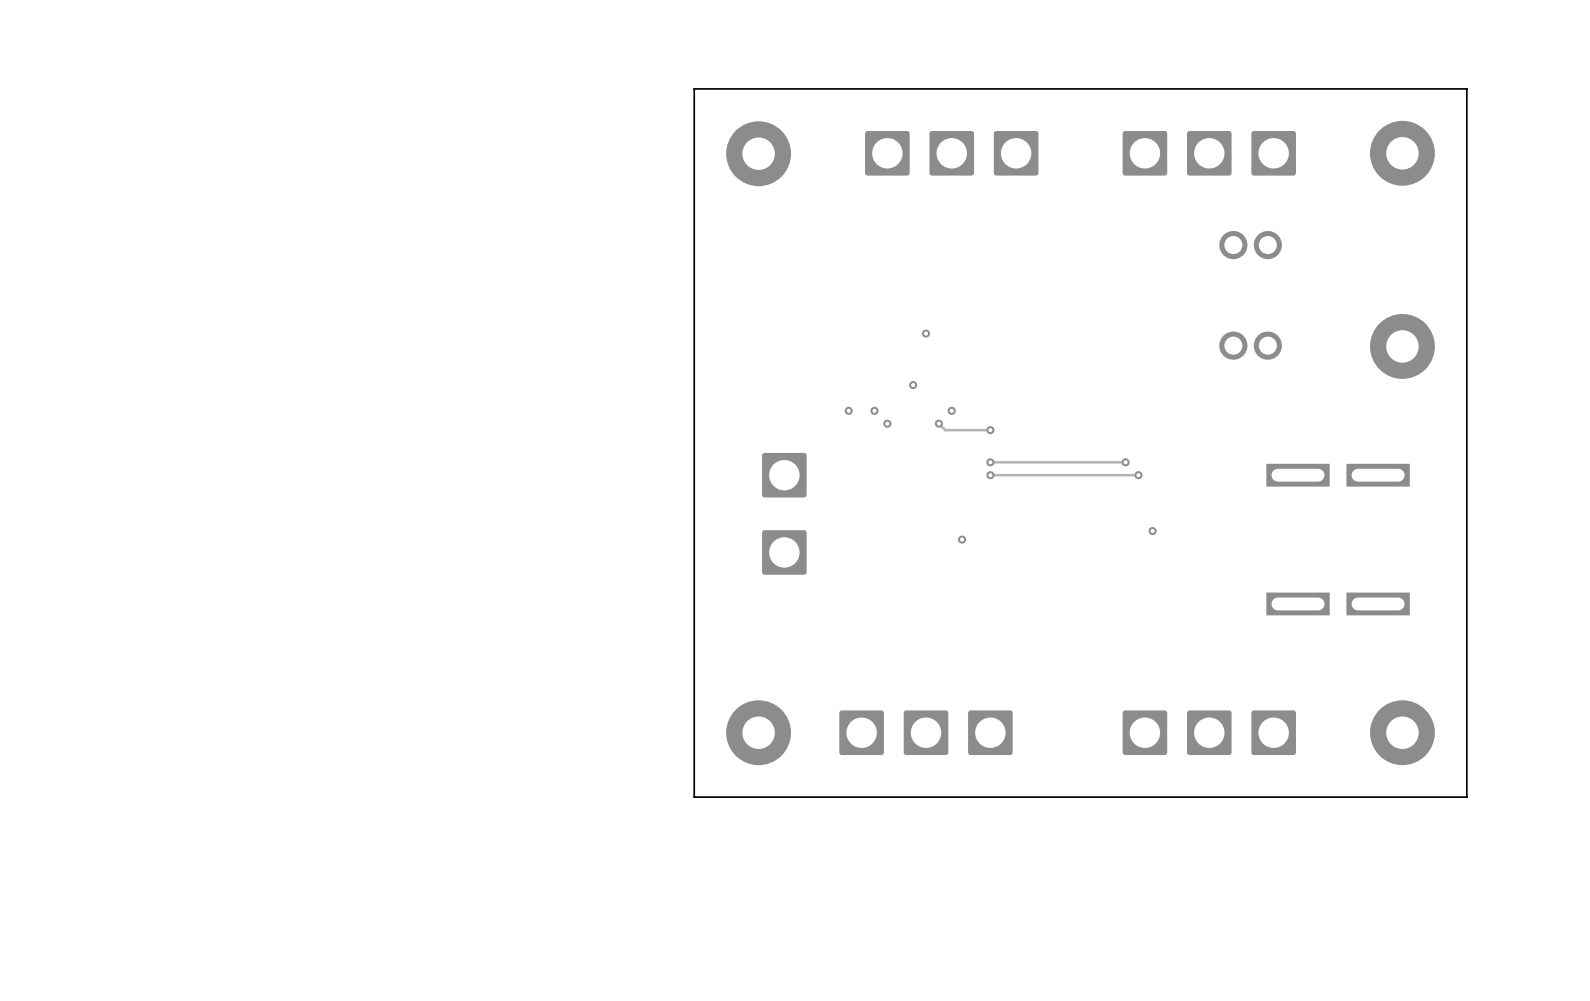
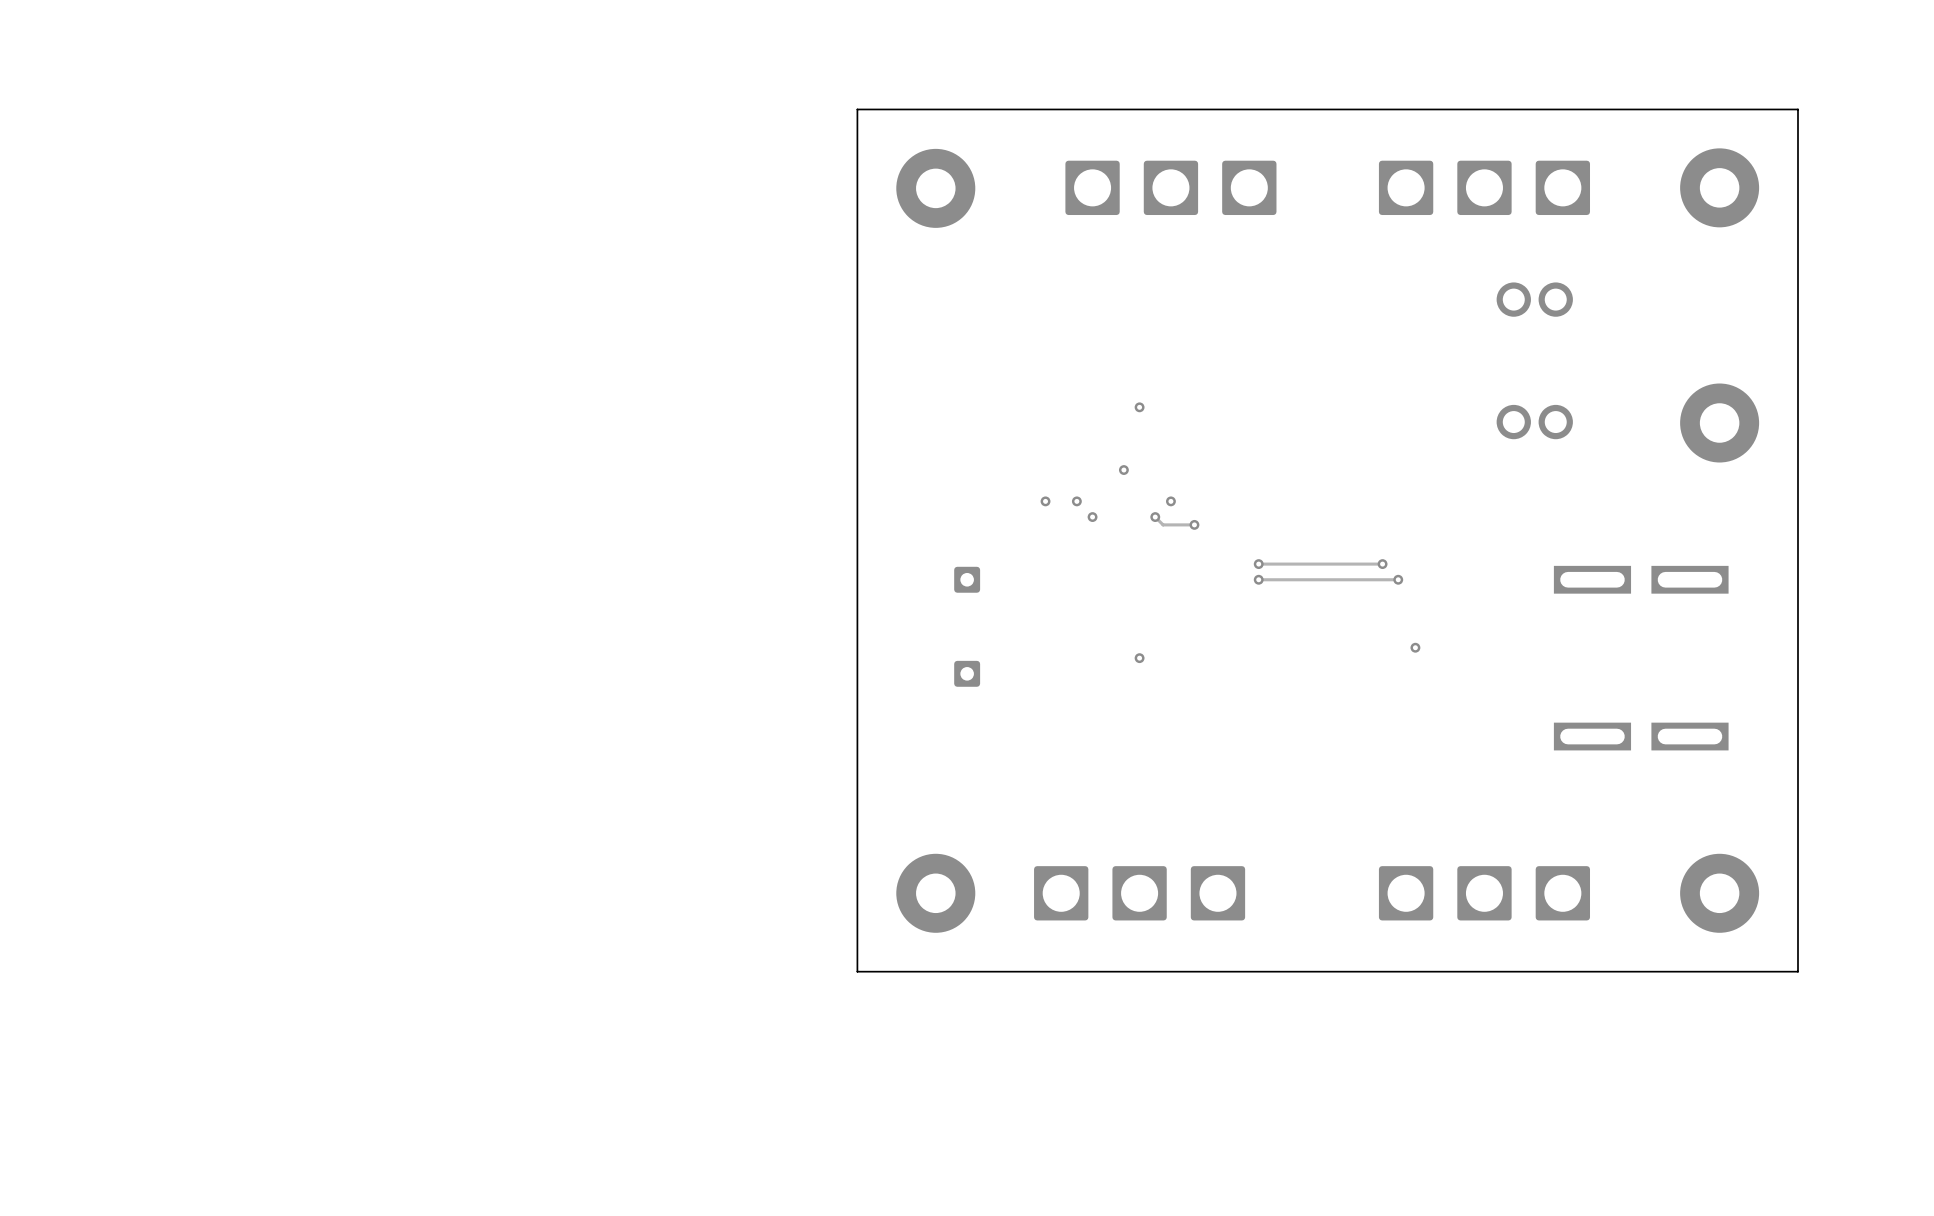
via: none -> (1194, 524)
track: (990, 430) (971, 430) -> none
via: (990, 430) -> none
part footprint: [762, 452, 807, 498] -> [954, 566, 981, 593]
via: (990, 462) -> none
track: (1023, 462) (990, 462) -> none
via: none -> (1258, 564)
via: (990, 475) -> none
track: (1023, 475) (990, 475) -> none
via: none -> (1258, 579)
part footprint: [762, 530, 807, 575] -> [954, 660, 981, 687]
via position: (962, 539) -> (1139, 658)

